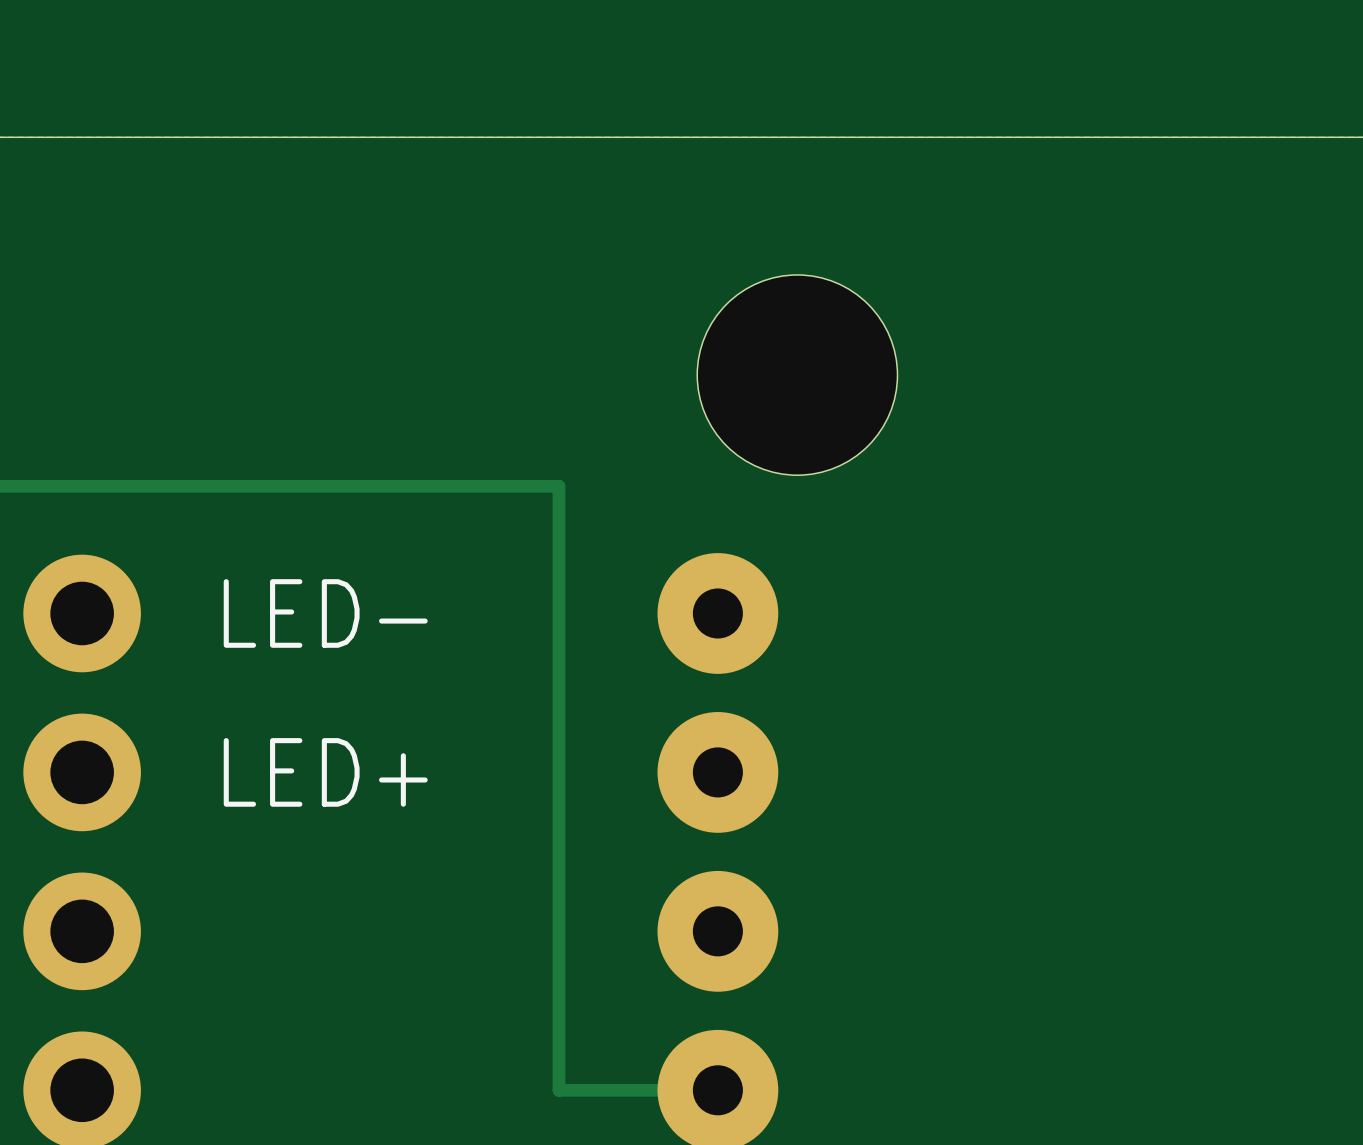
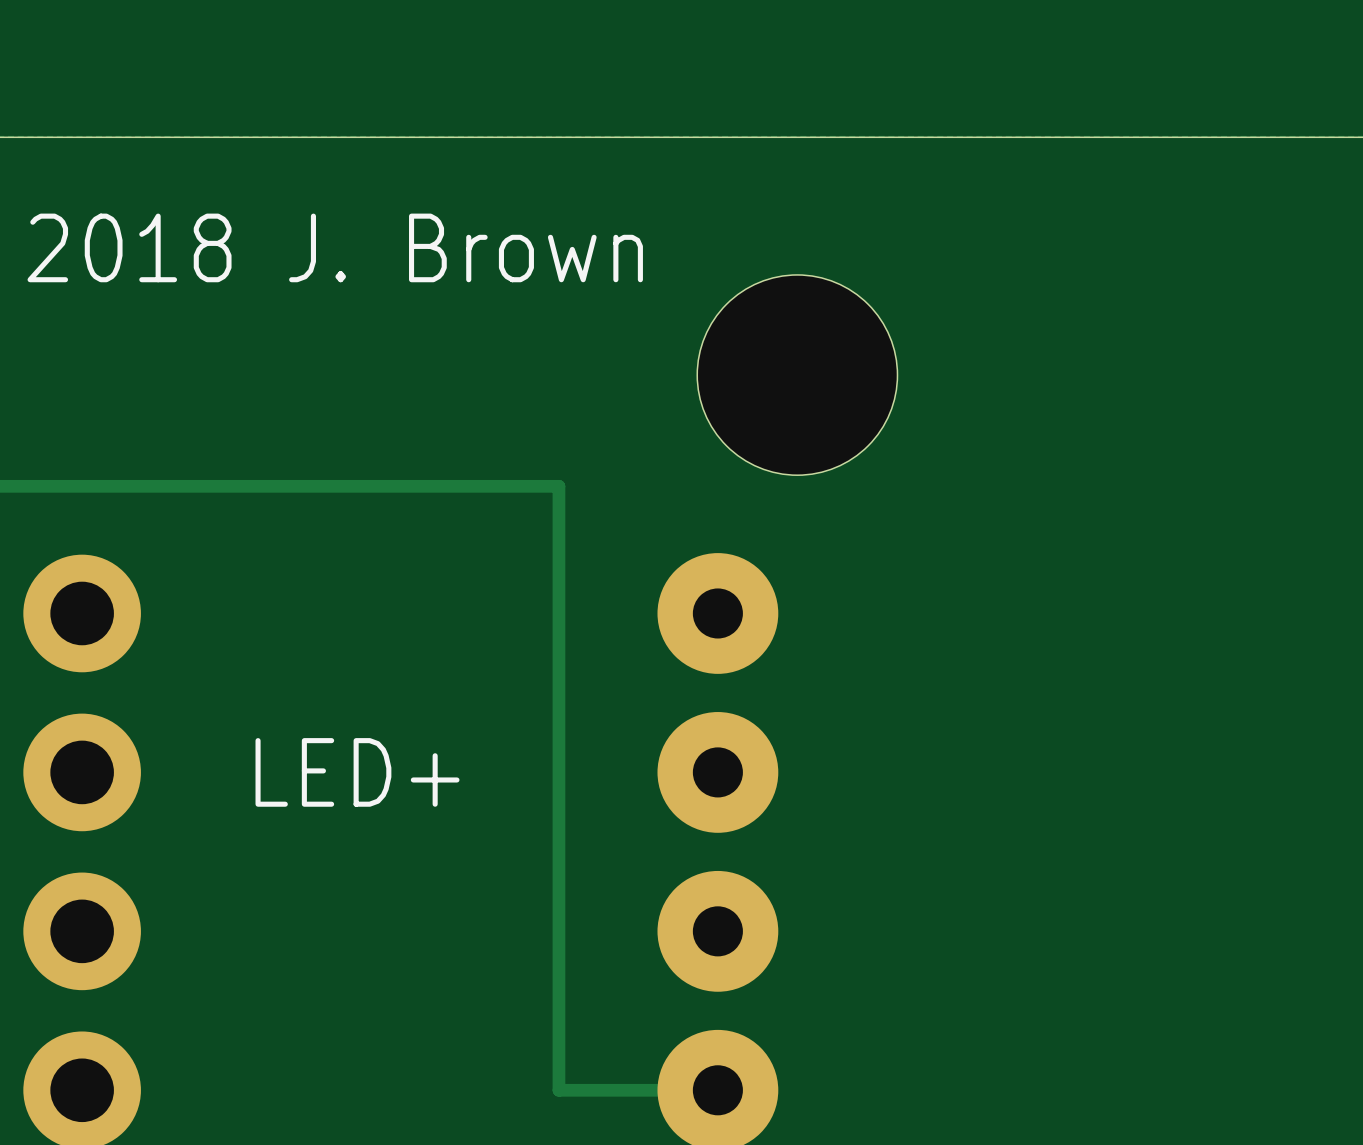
text: none -> 2018 J. Brown (335, 247)
text: LED- (325, 613) -> none
text position: LED+ (325, 772) -> LED+ (357, 772)

